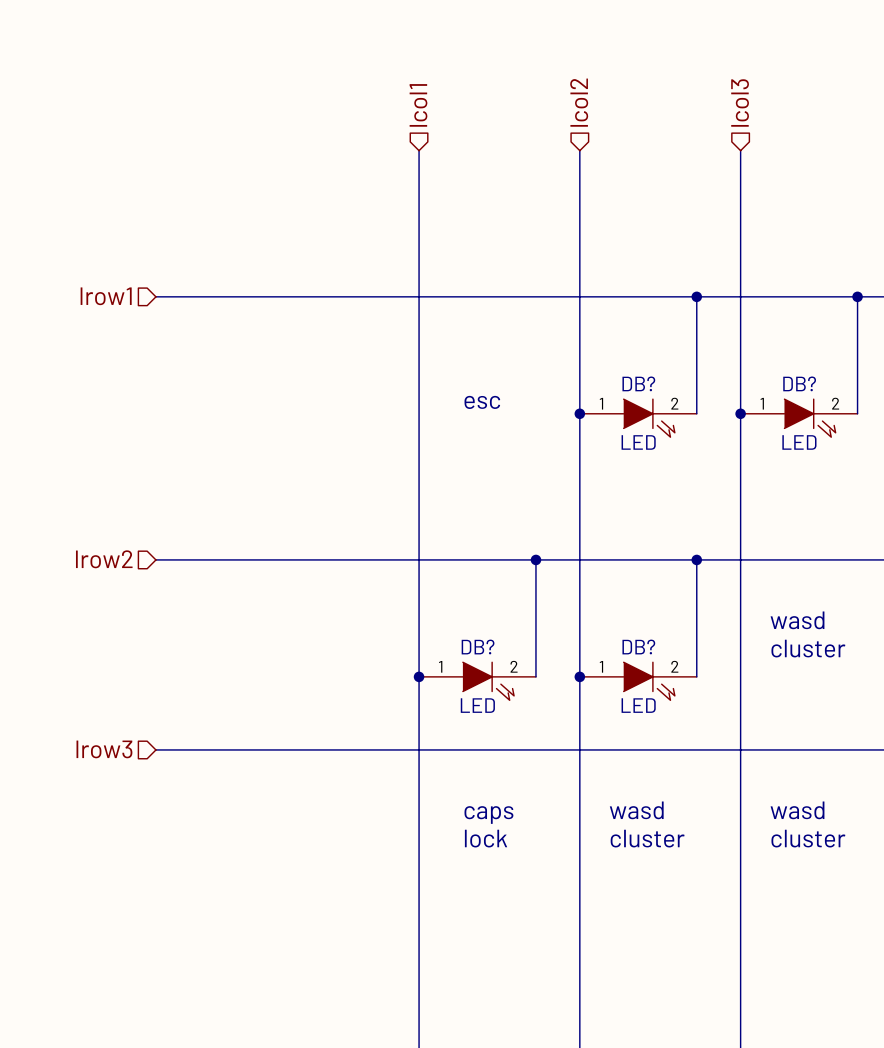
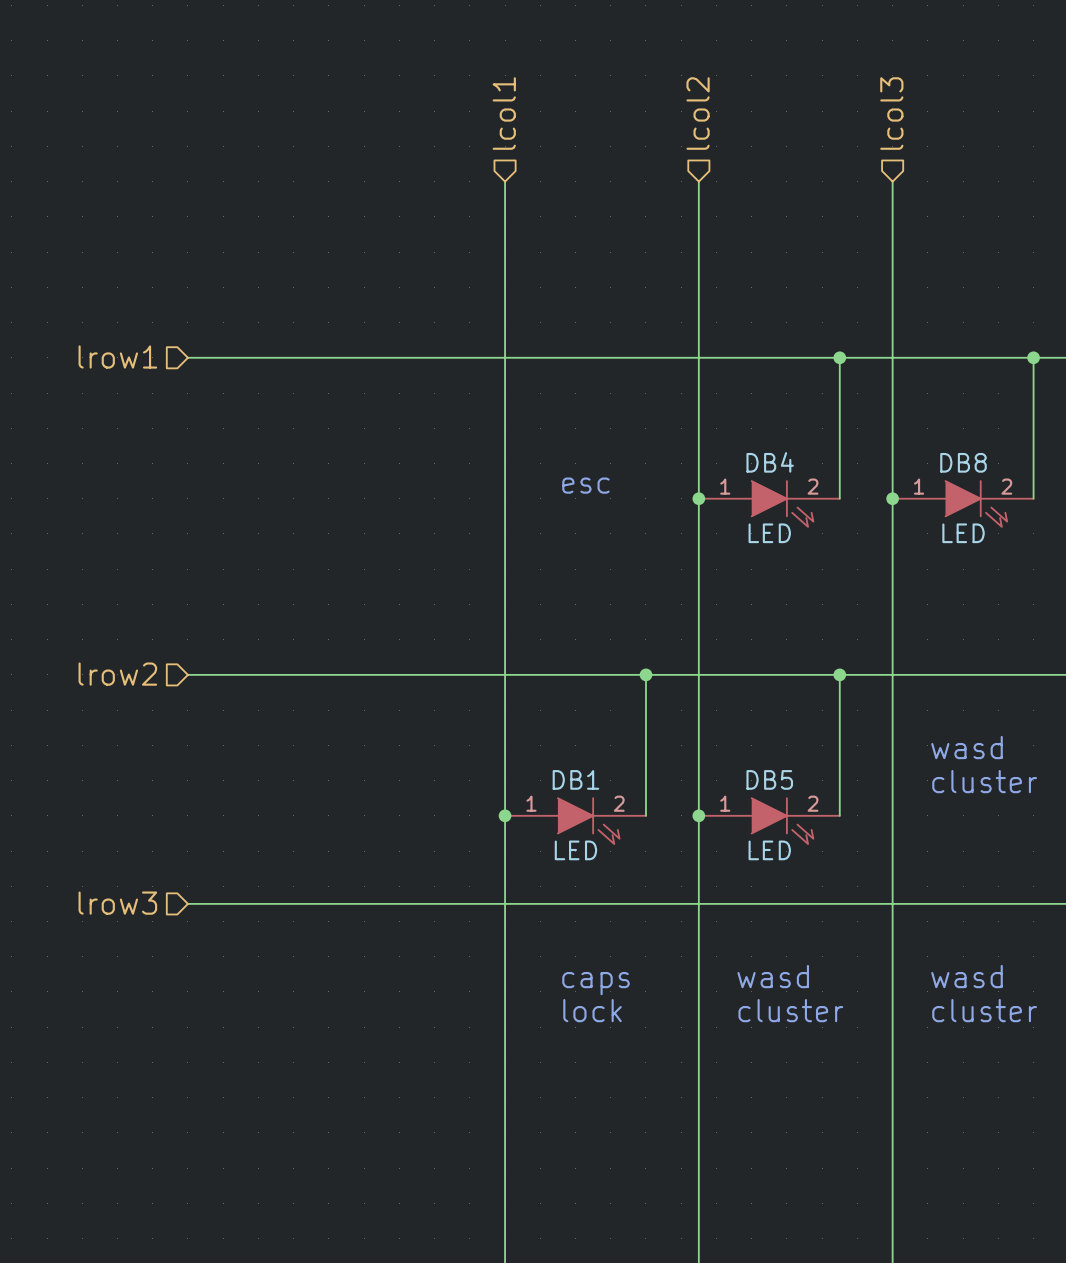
DB? name: DB? (638, 383) -> DB4 (770, 462)
DB? name: DB? (799, 383) -> DB8 (963, 462)
DB? name: DB? (478, 647) -> DB1 (575, 779)
DB? name: DB? (638, 647) -> DB5 (769, 779)

